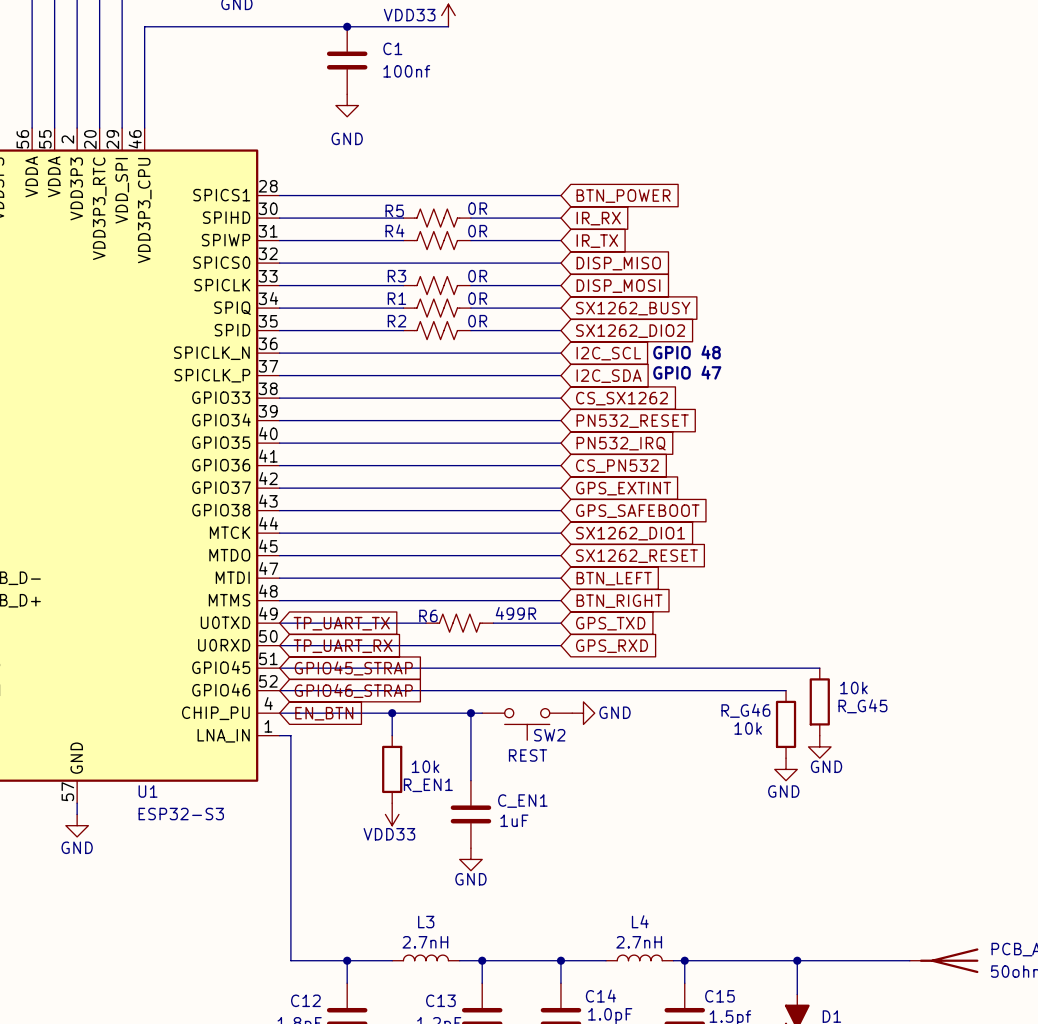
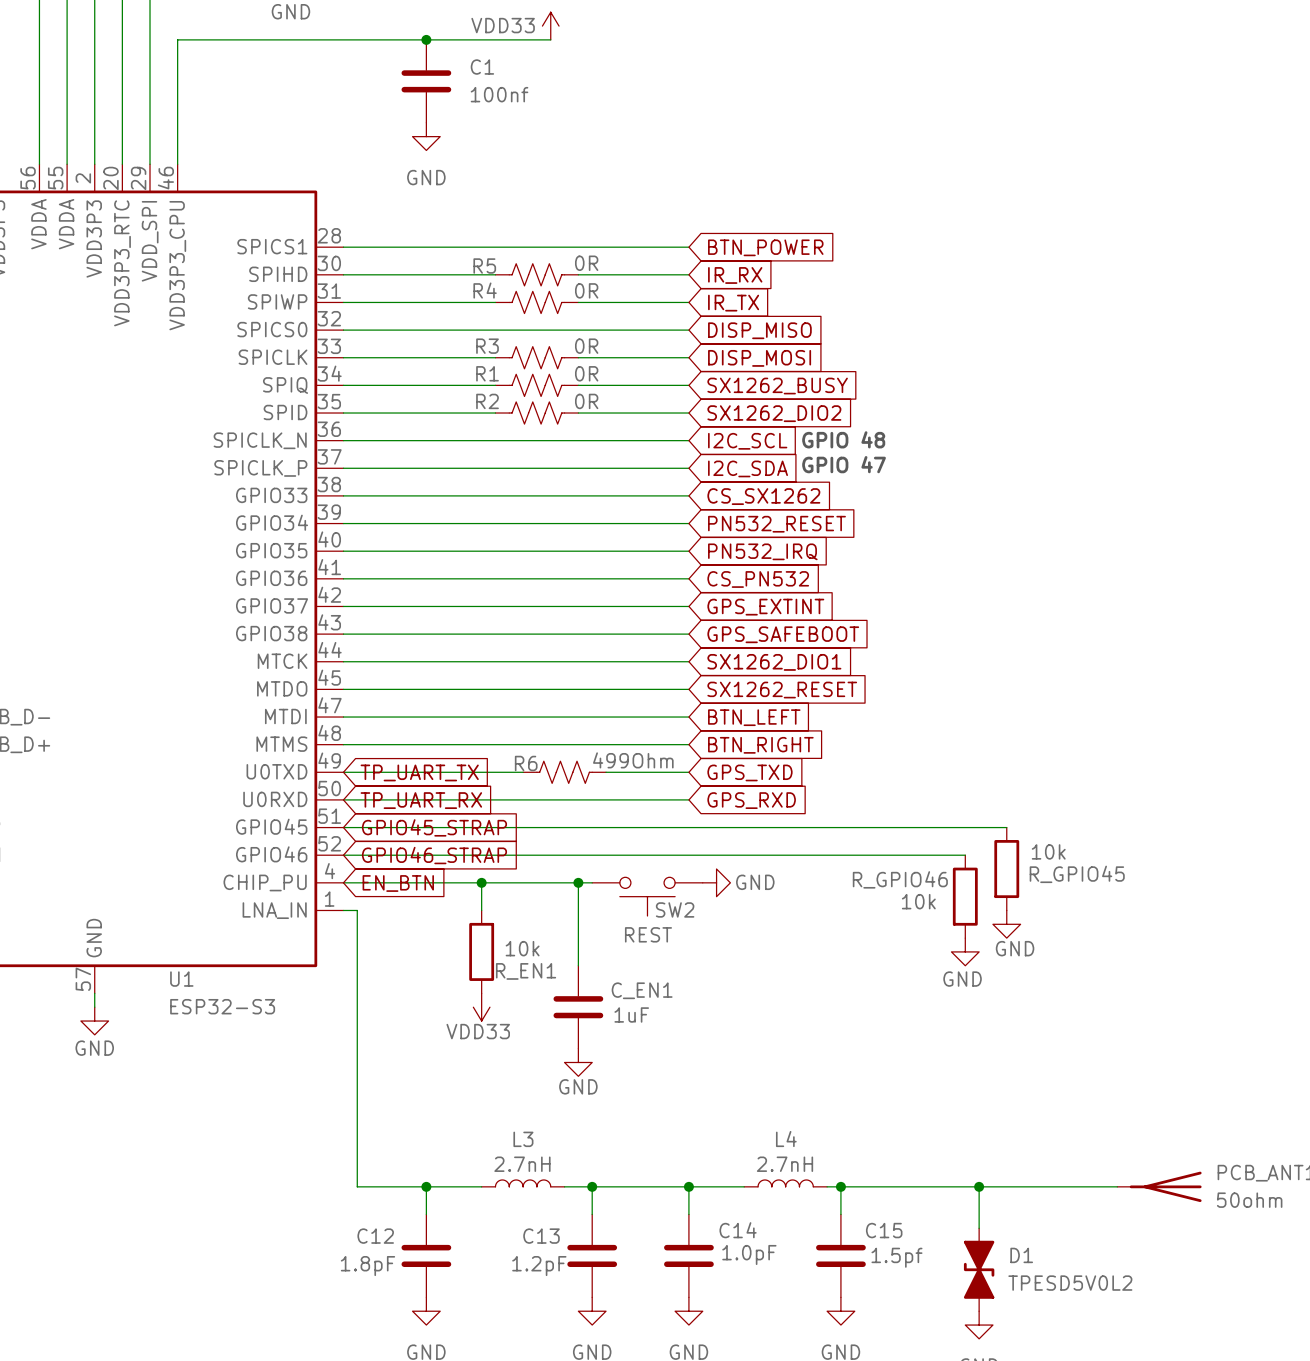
R6 value: 499R (515, 613) -> 499Ohm (633, 760)
R_G45 name: R_G45 (862, 706) -> R_GPIO45 (1077, 874)
R_G46 name: R_G46 (745, 710) -> R_GPIO46 (900, 879)

